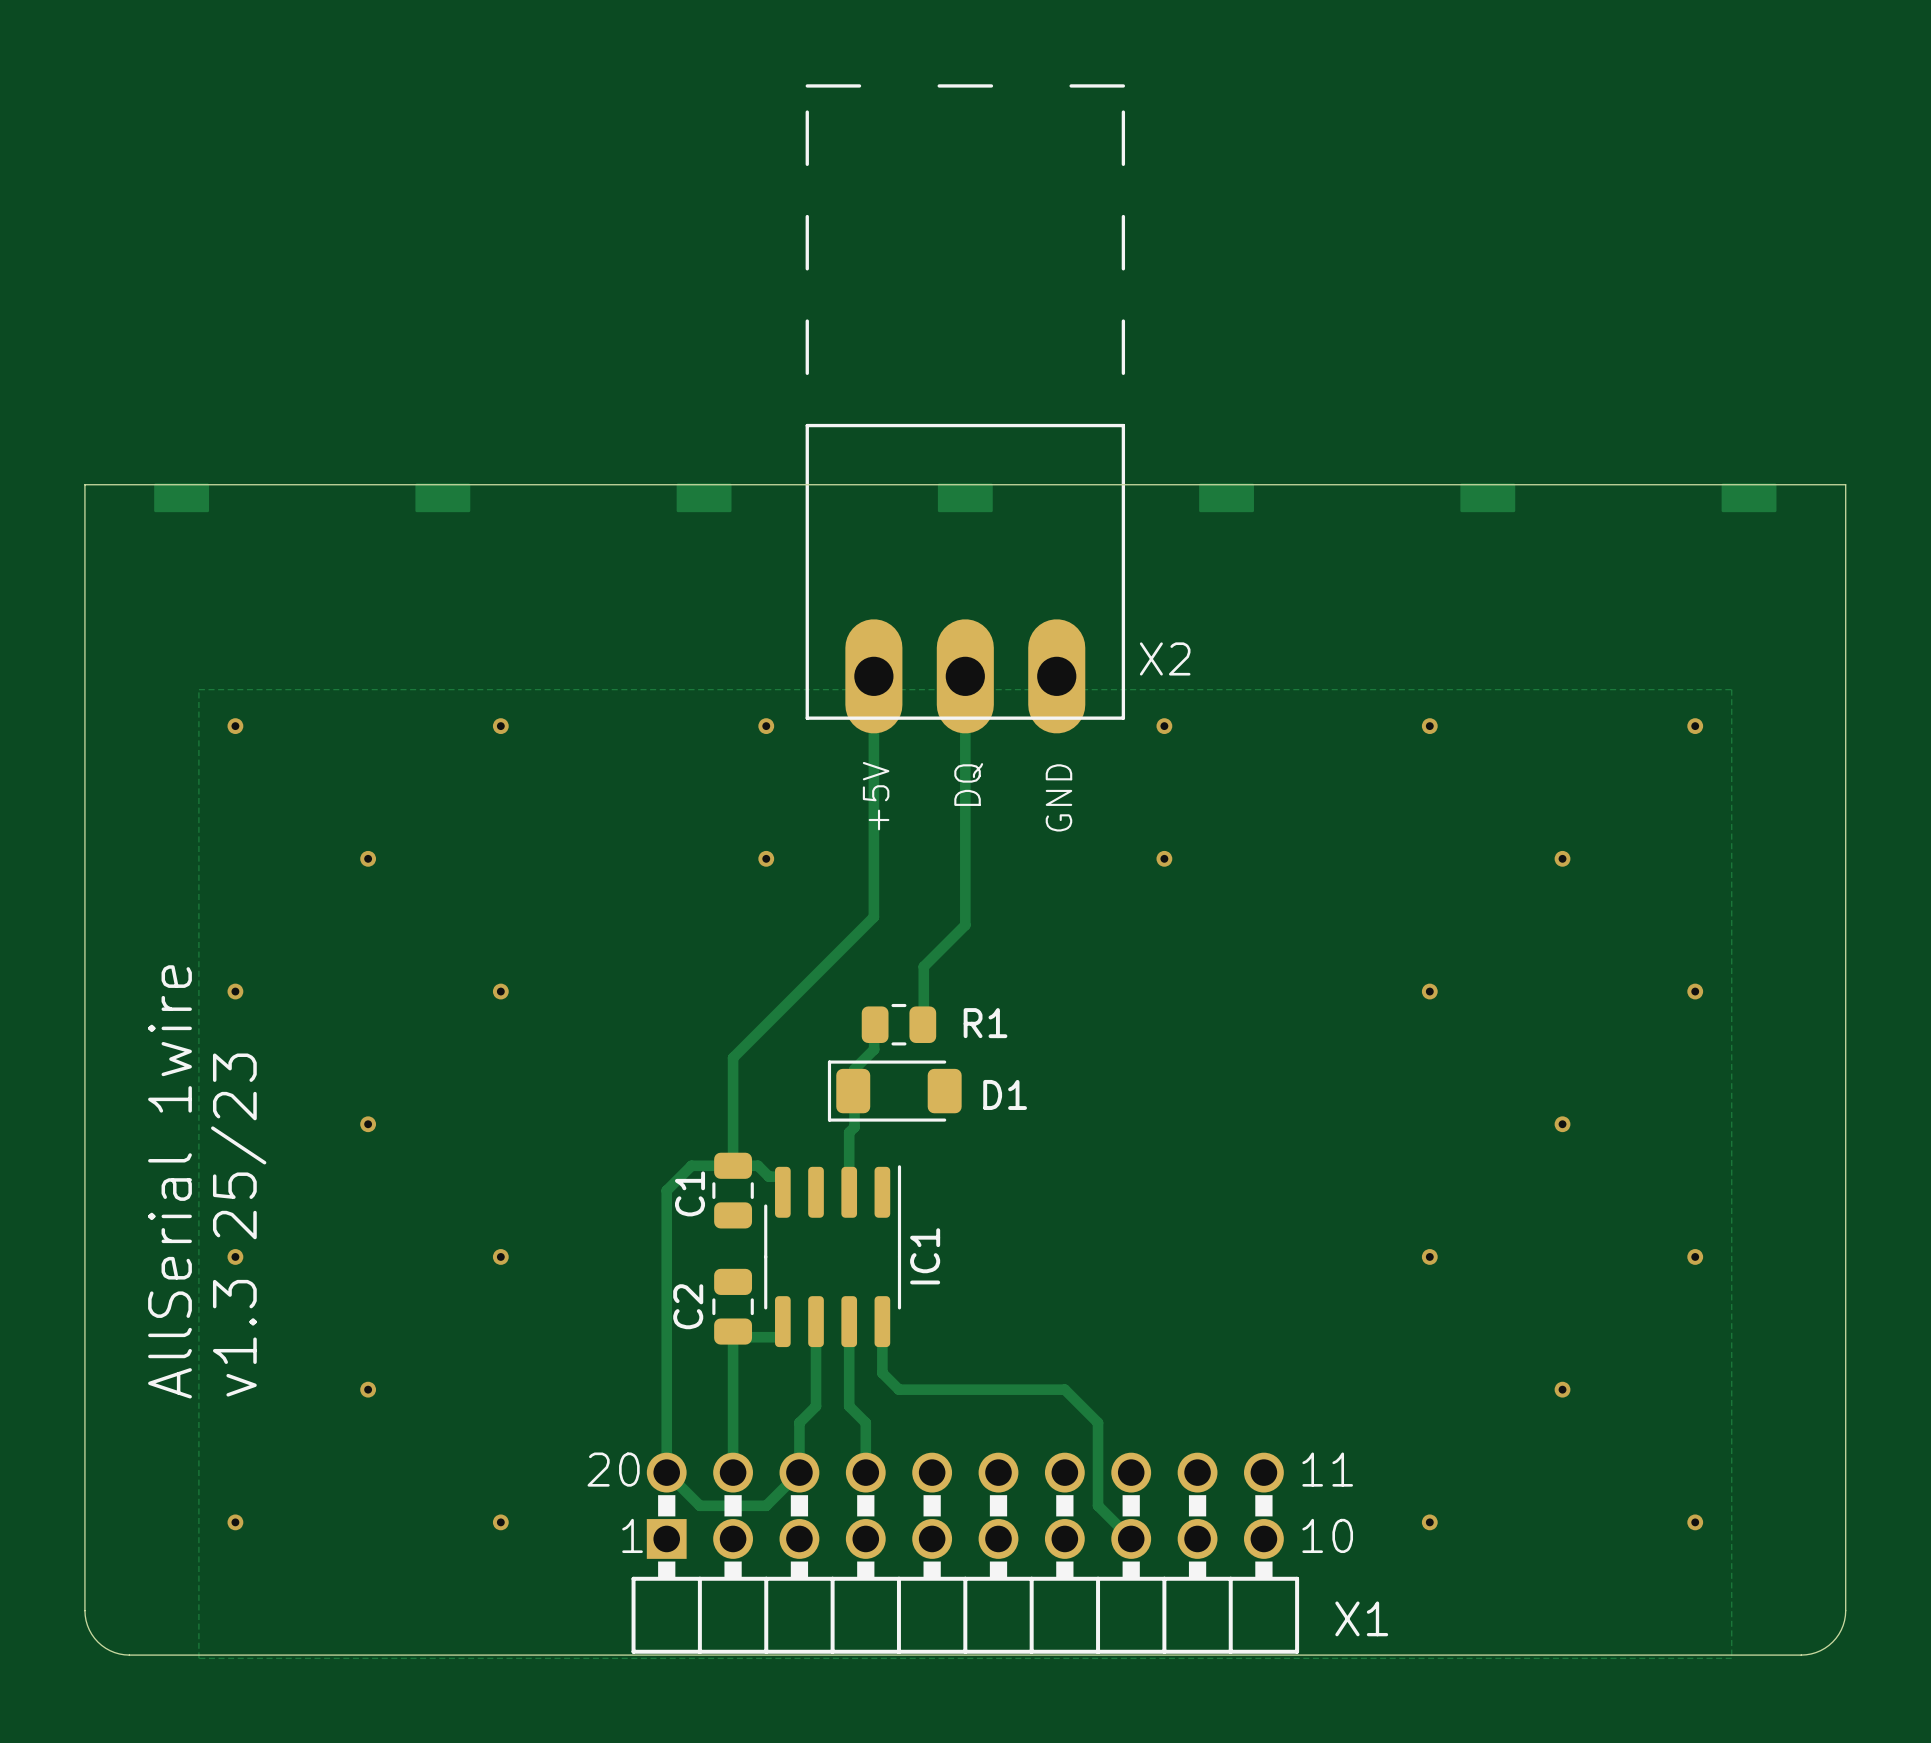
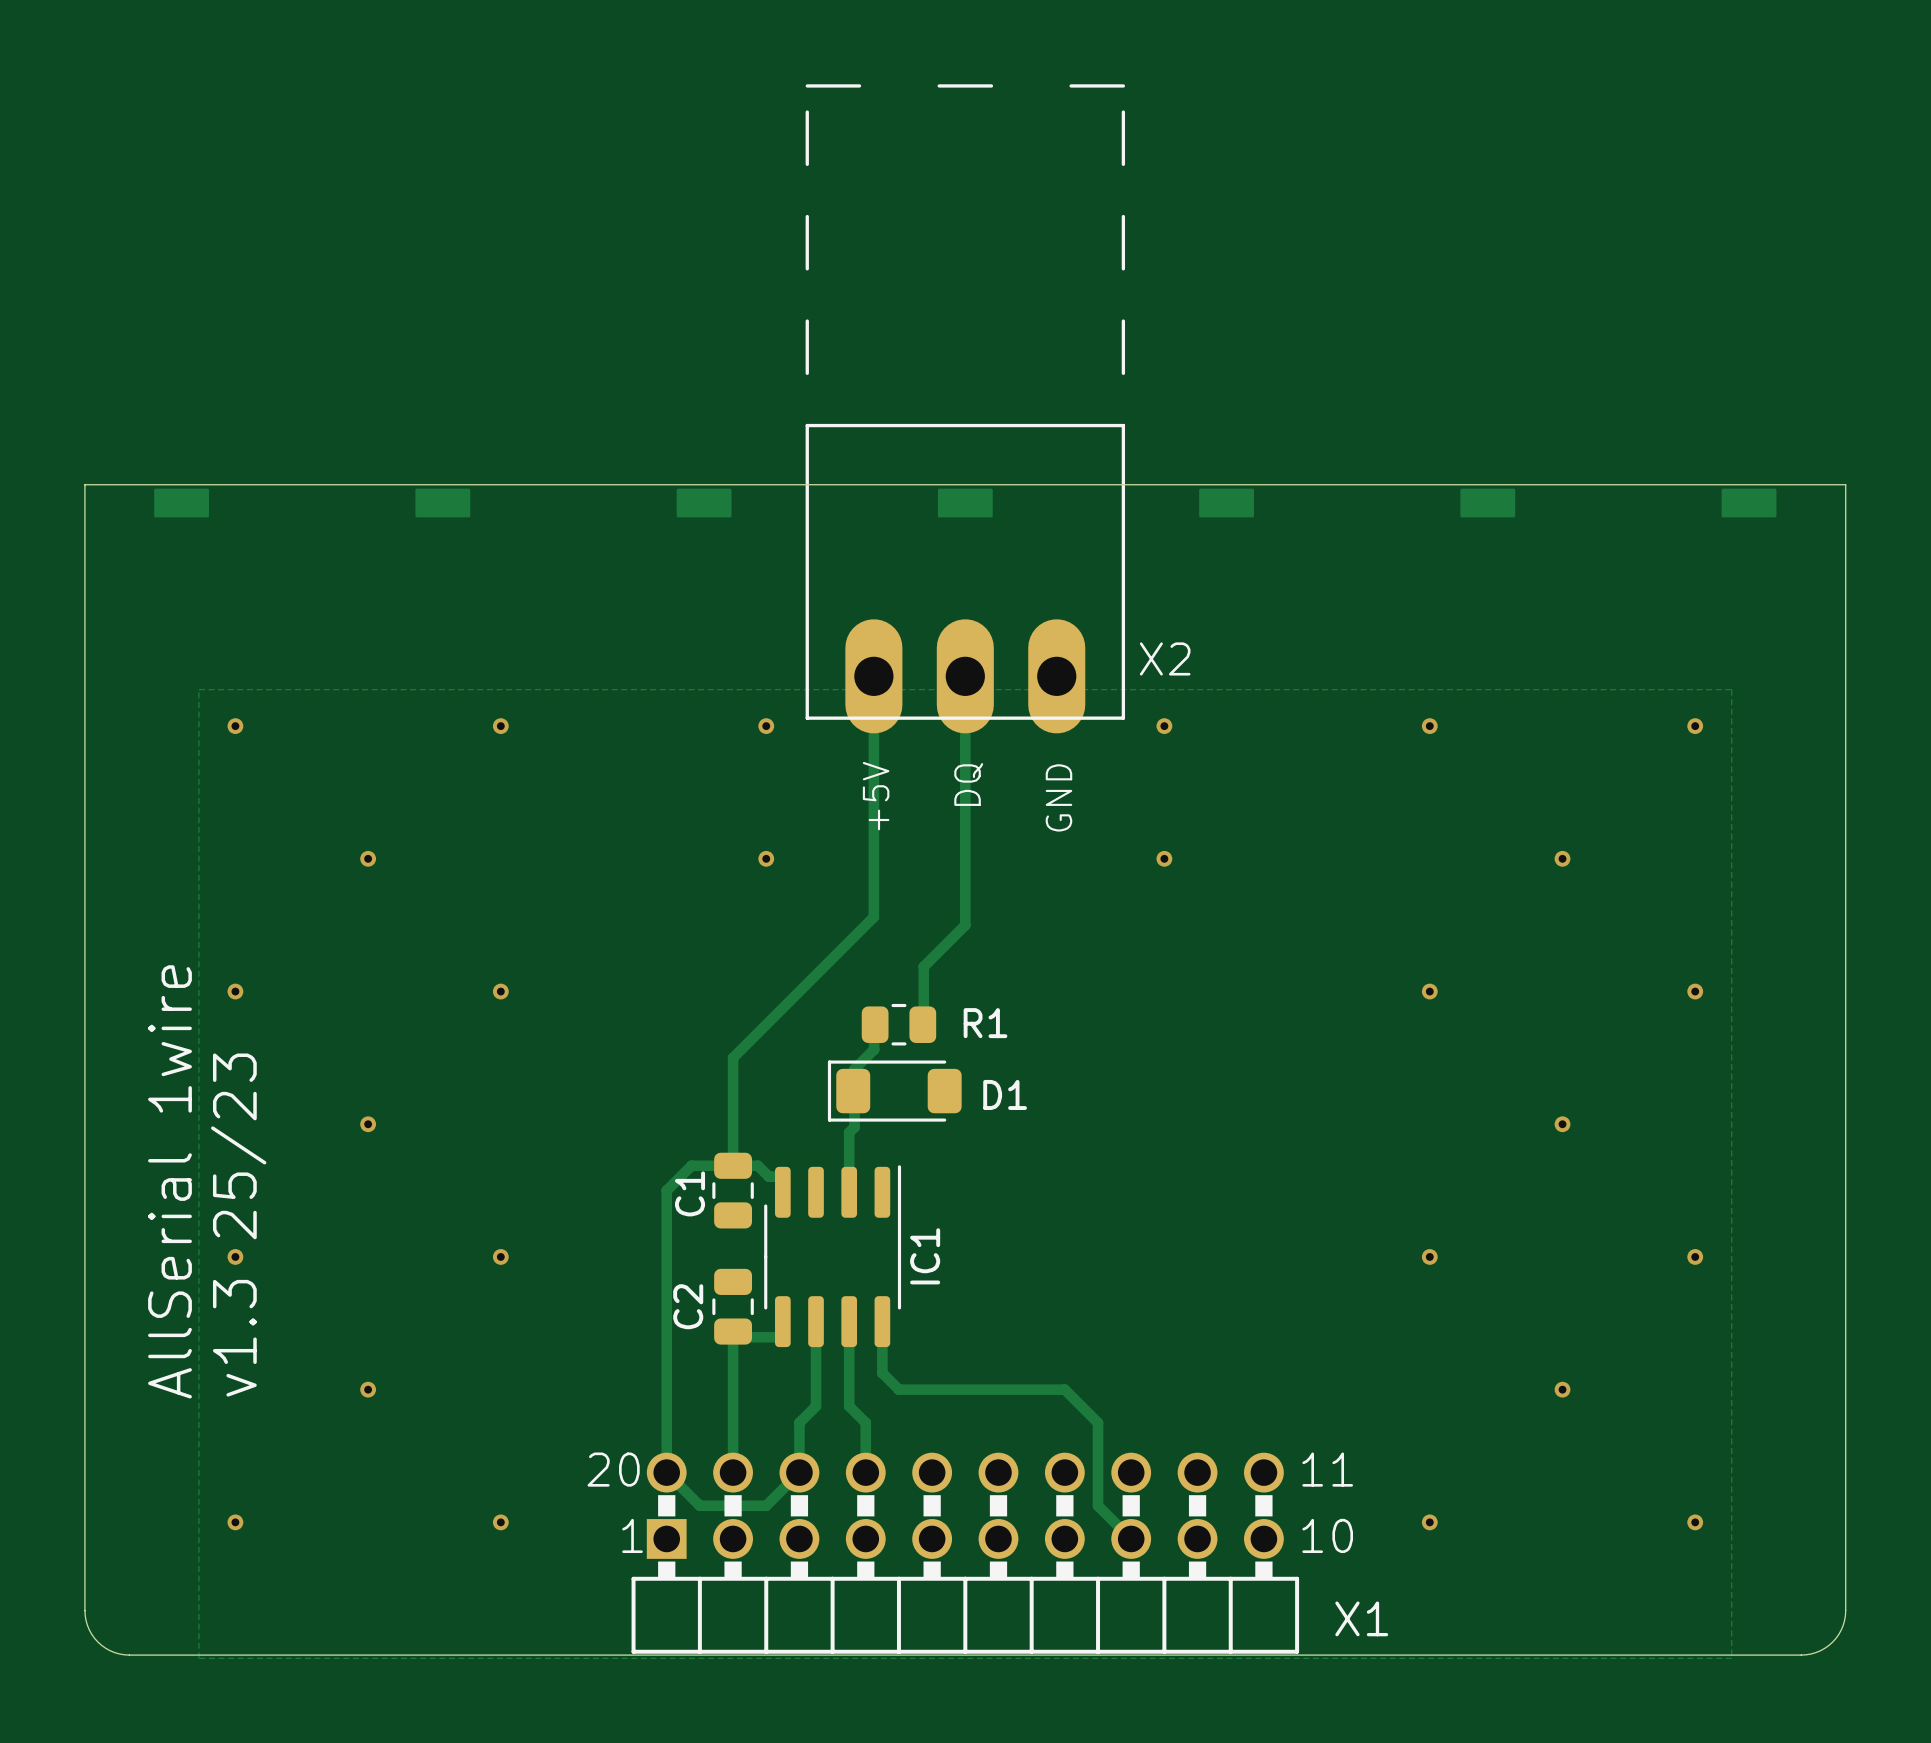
X1 footprint: [84, 483, 1847, 1656] -> [84, 484, 1847, 1656]

